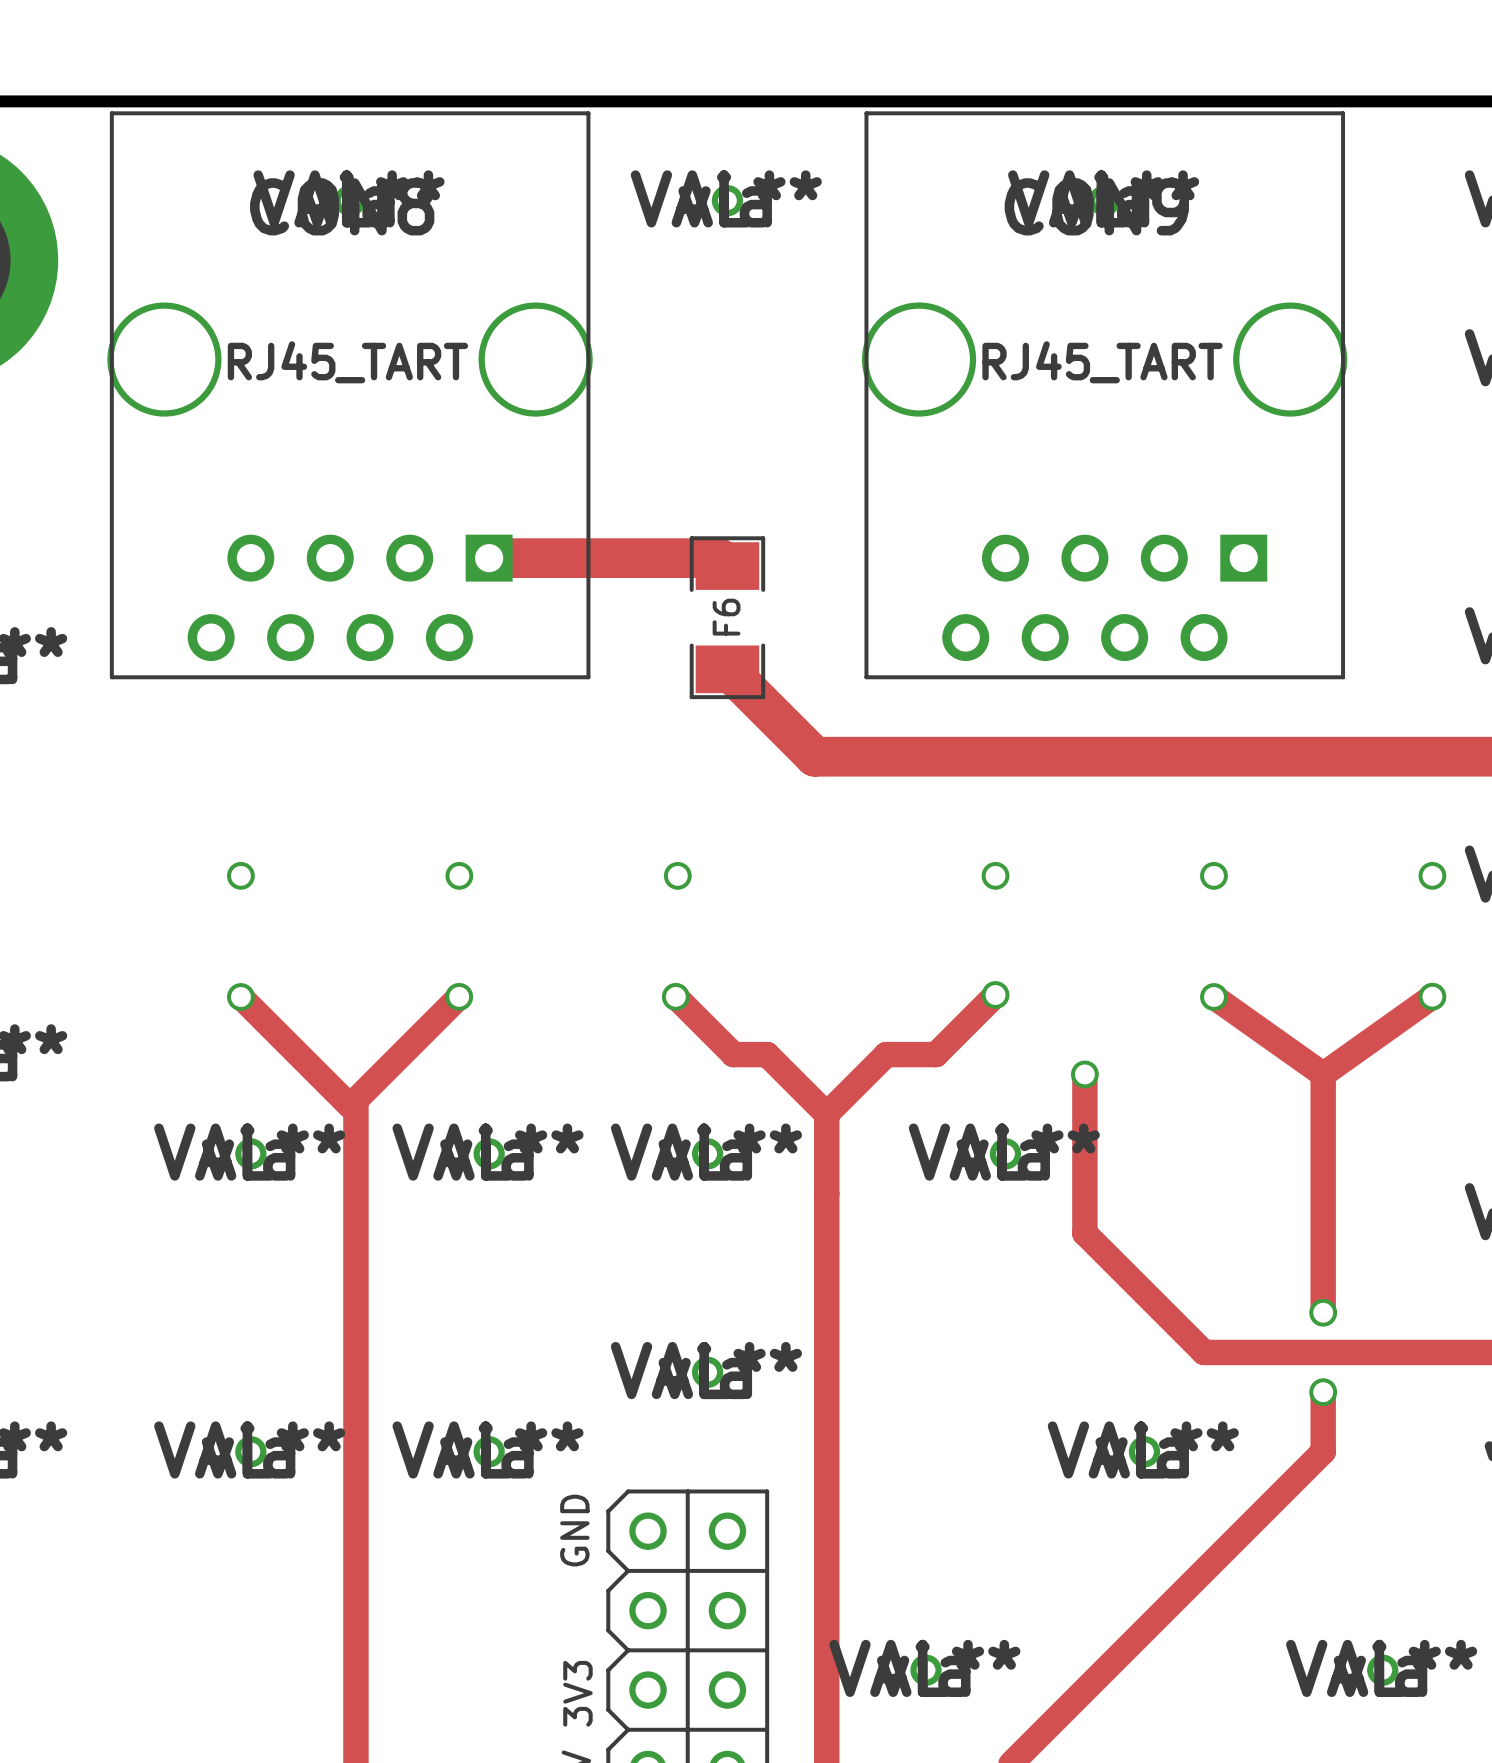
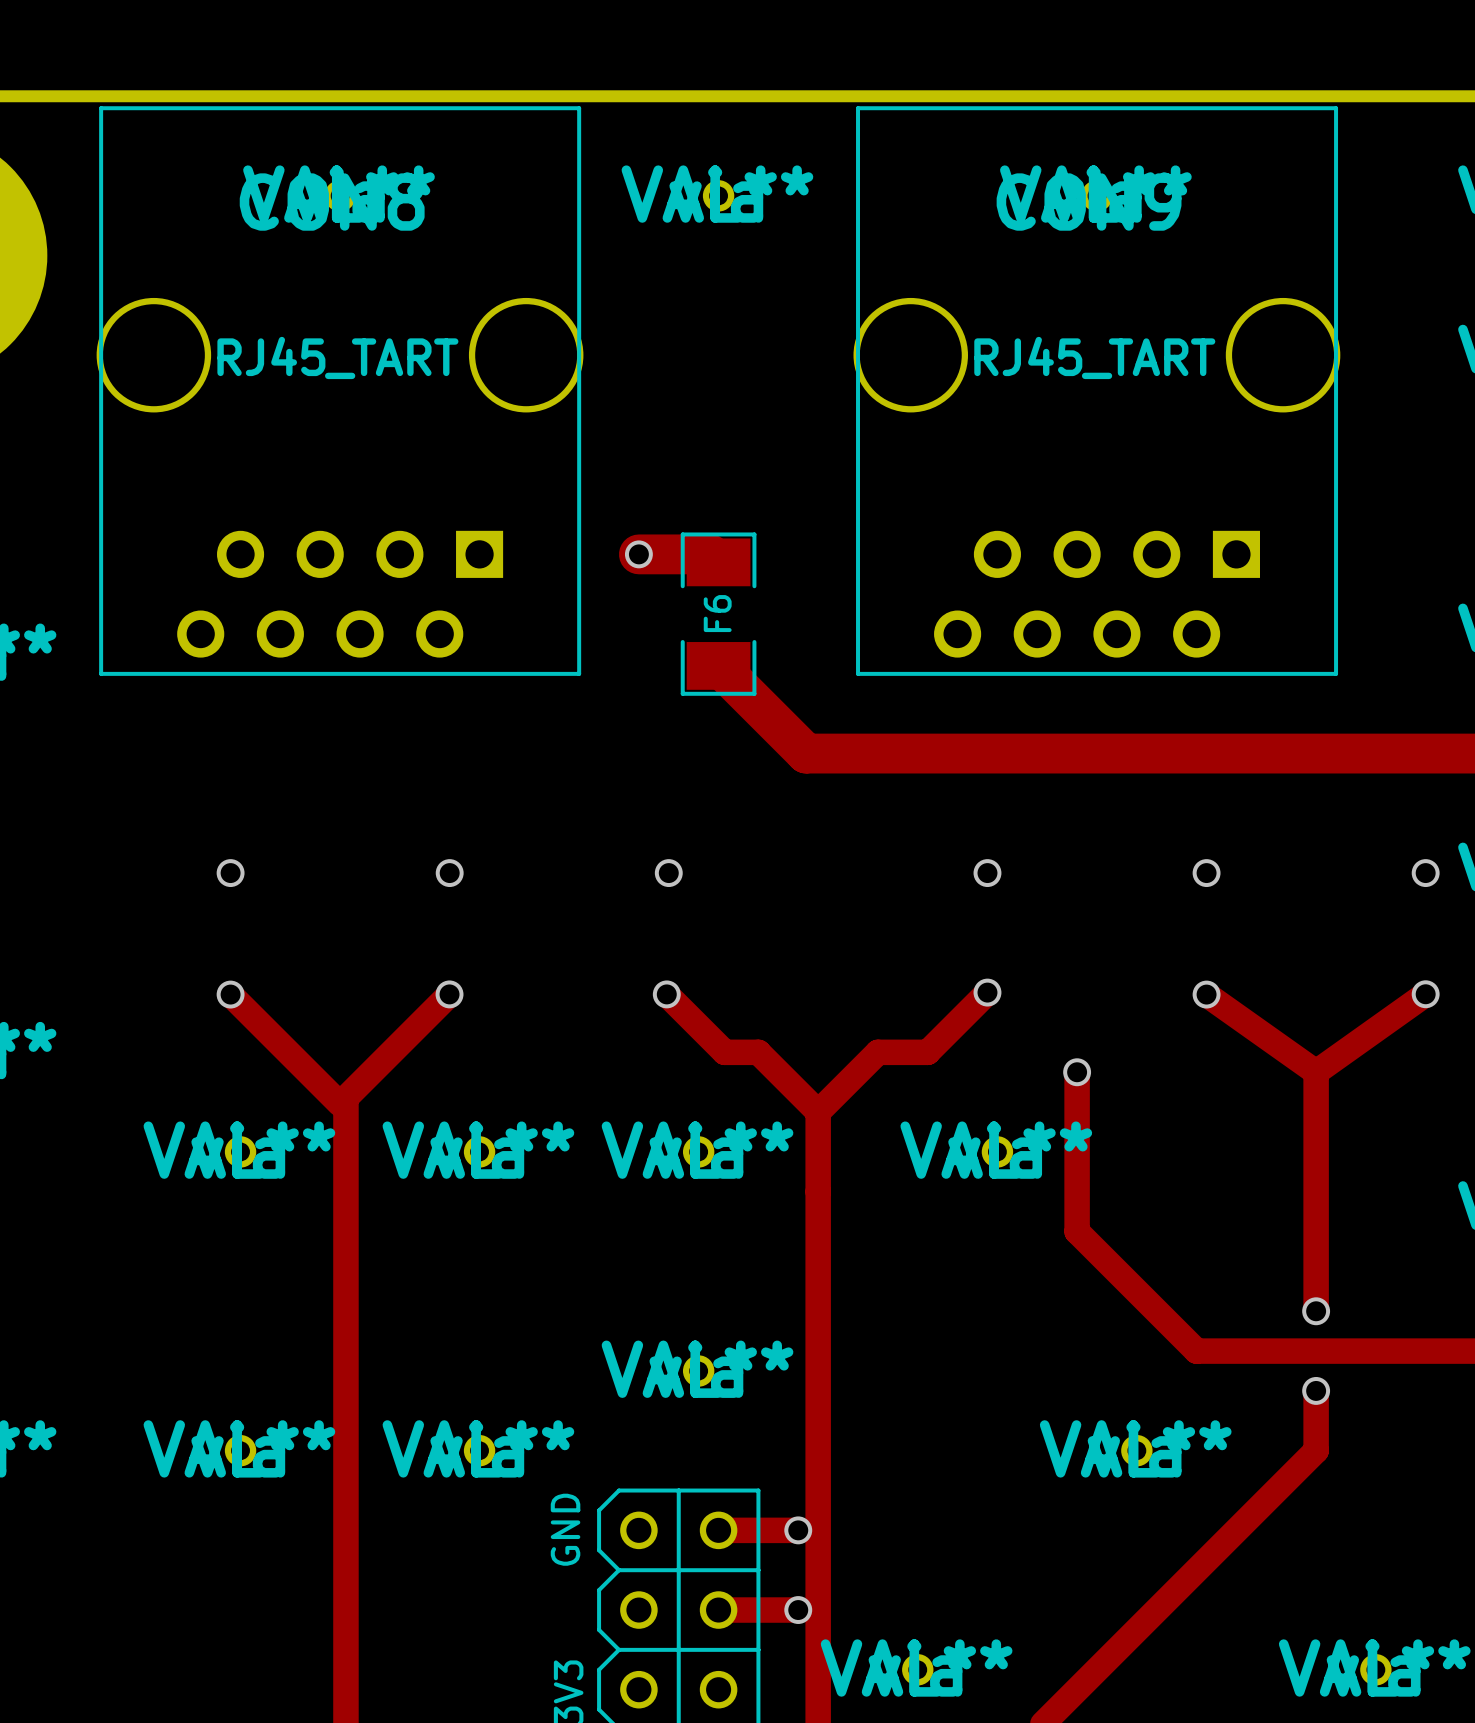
track: (489, 558) (648, 558) -> none
via: none -> (638, 554)
track: none -> (718, 1530) (798, 1530)
via: none -> (798, 1530)
track: none -> (718, 1610) (798, 1610)
via: none -> (798, 1610)

